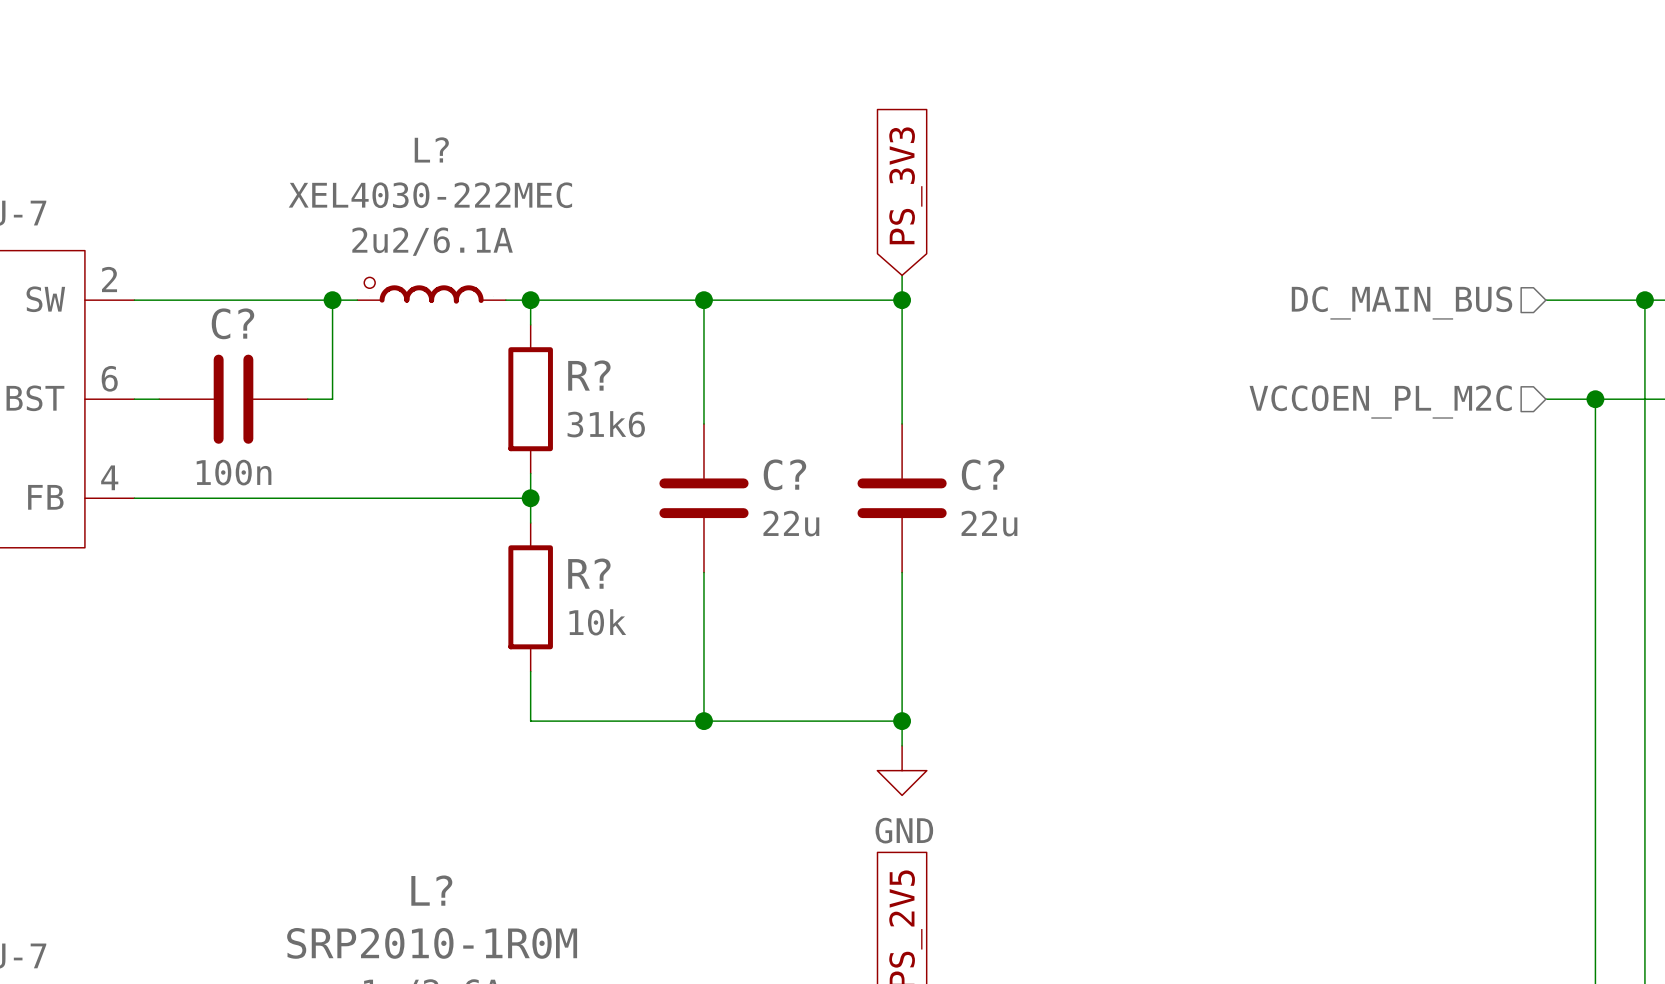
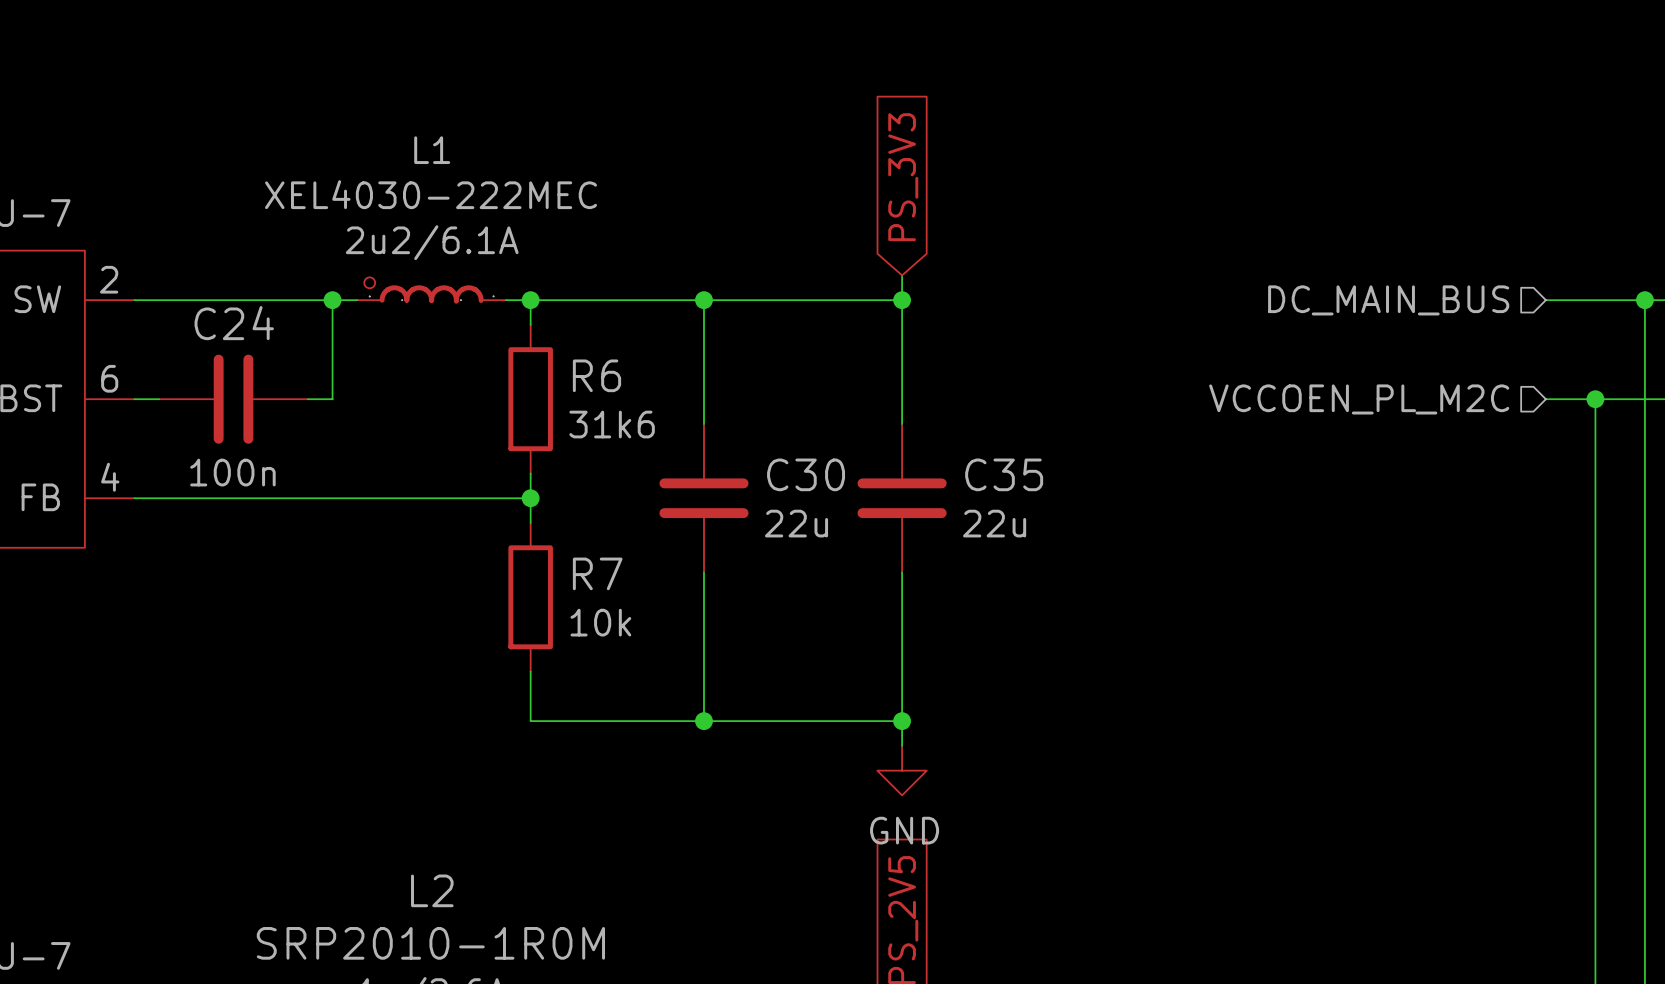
L? name: L? (431, 149) -> L1 (432, 150)
C? name: C? (232, 323) -> C24 (234, 323)
R? name: R? (589, 375) -> R6 (596, 375)
C? name: C? (784, 474) -> C30 (806, 474)
C? name: C? (983, 474) -> C35 (1004, 474)
R? name: R? (589, 573) -> R7 (597, 573)
L? name: L? (431, 890) -> L2 (432, 890)

